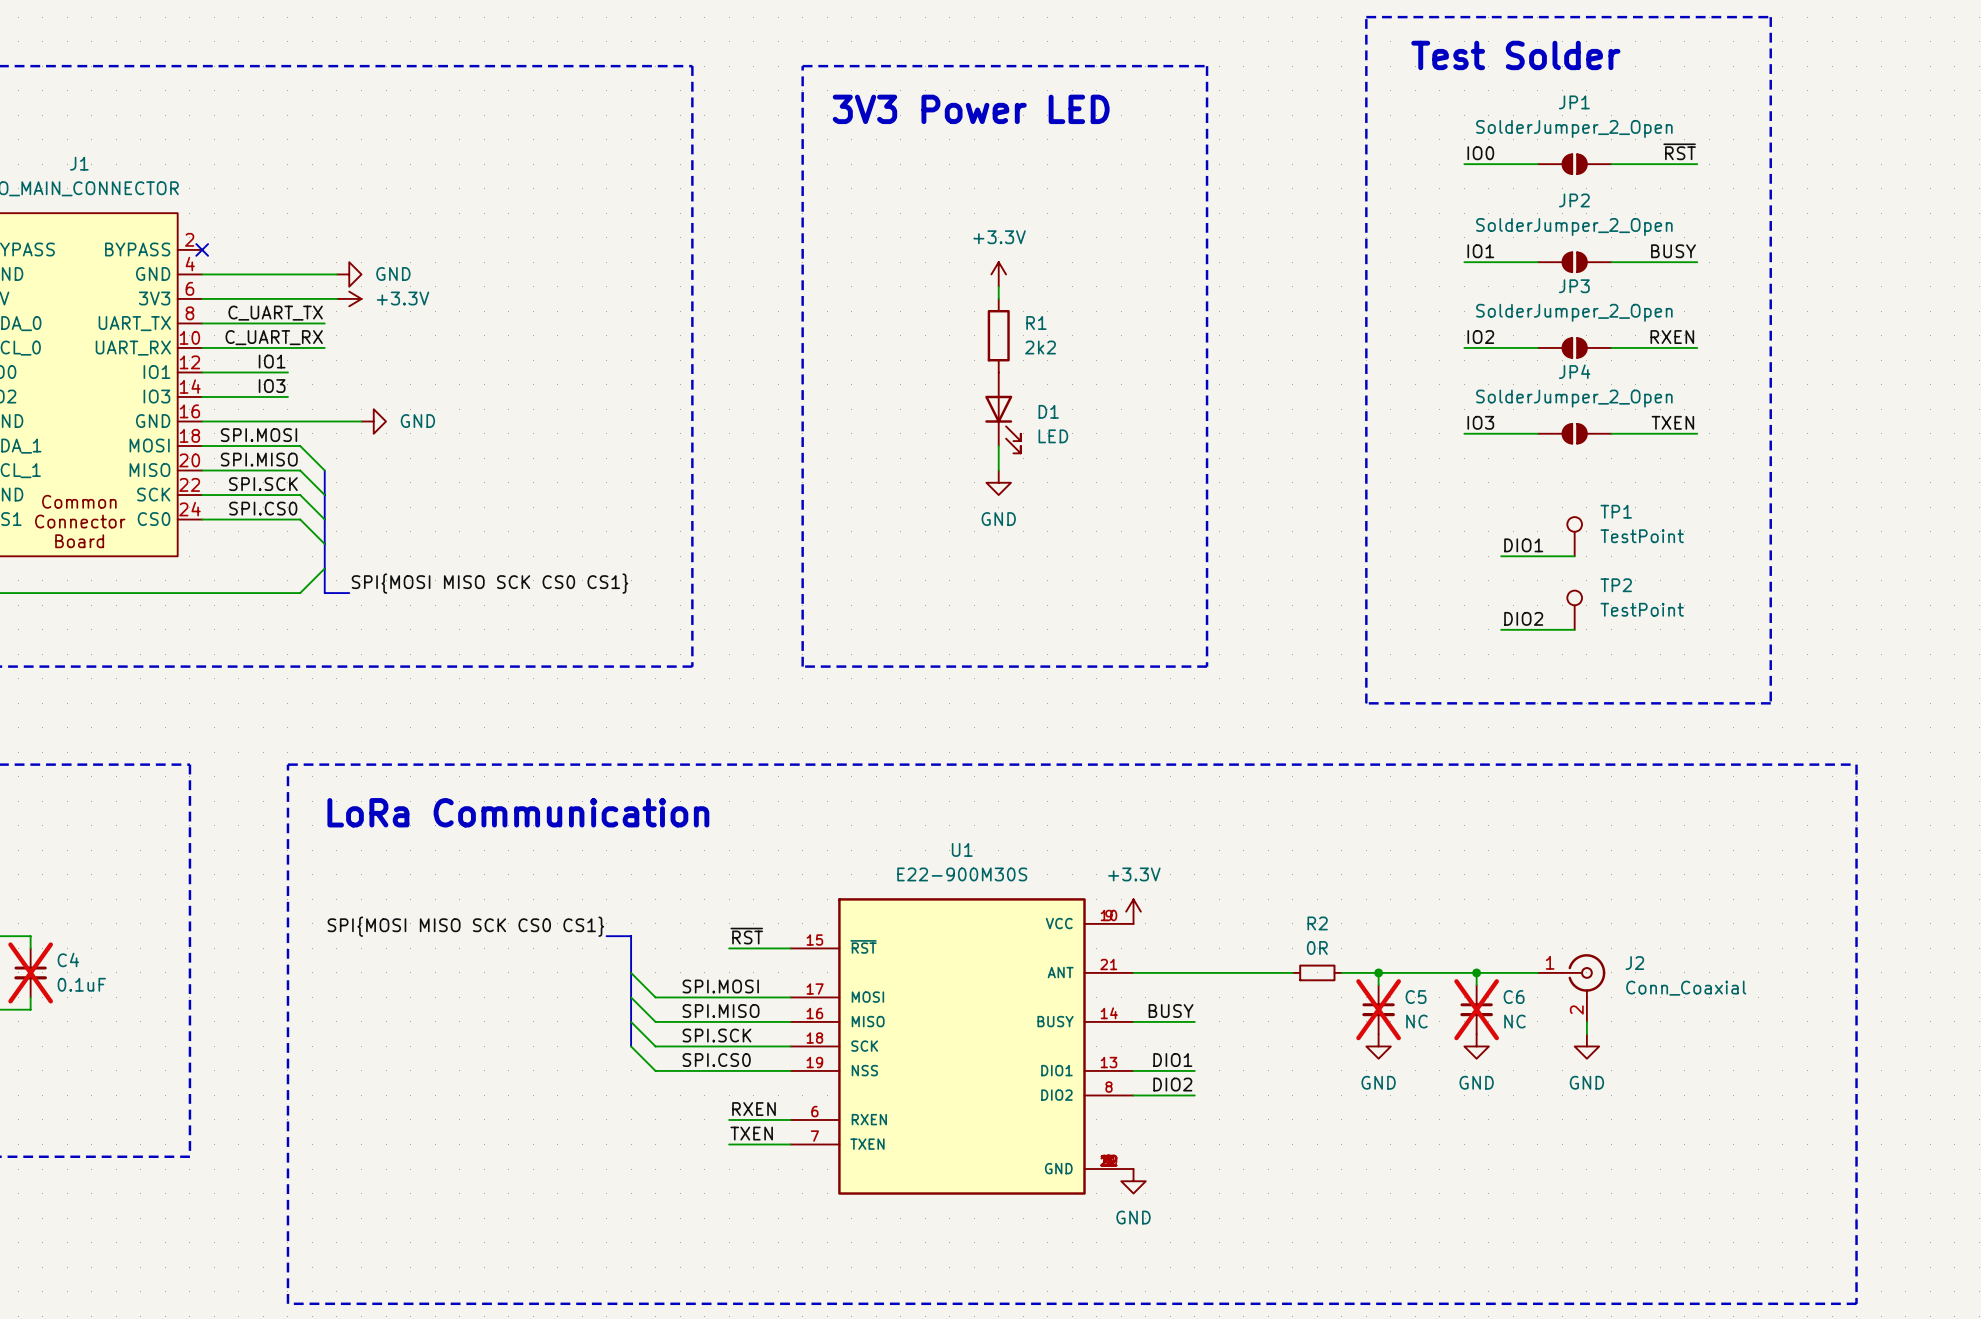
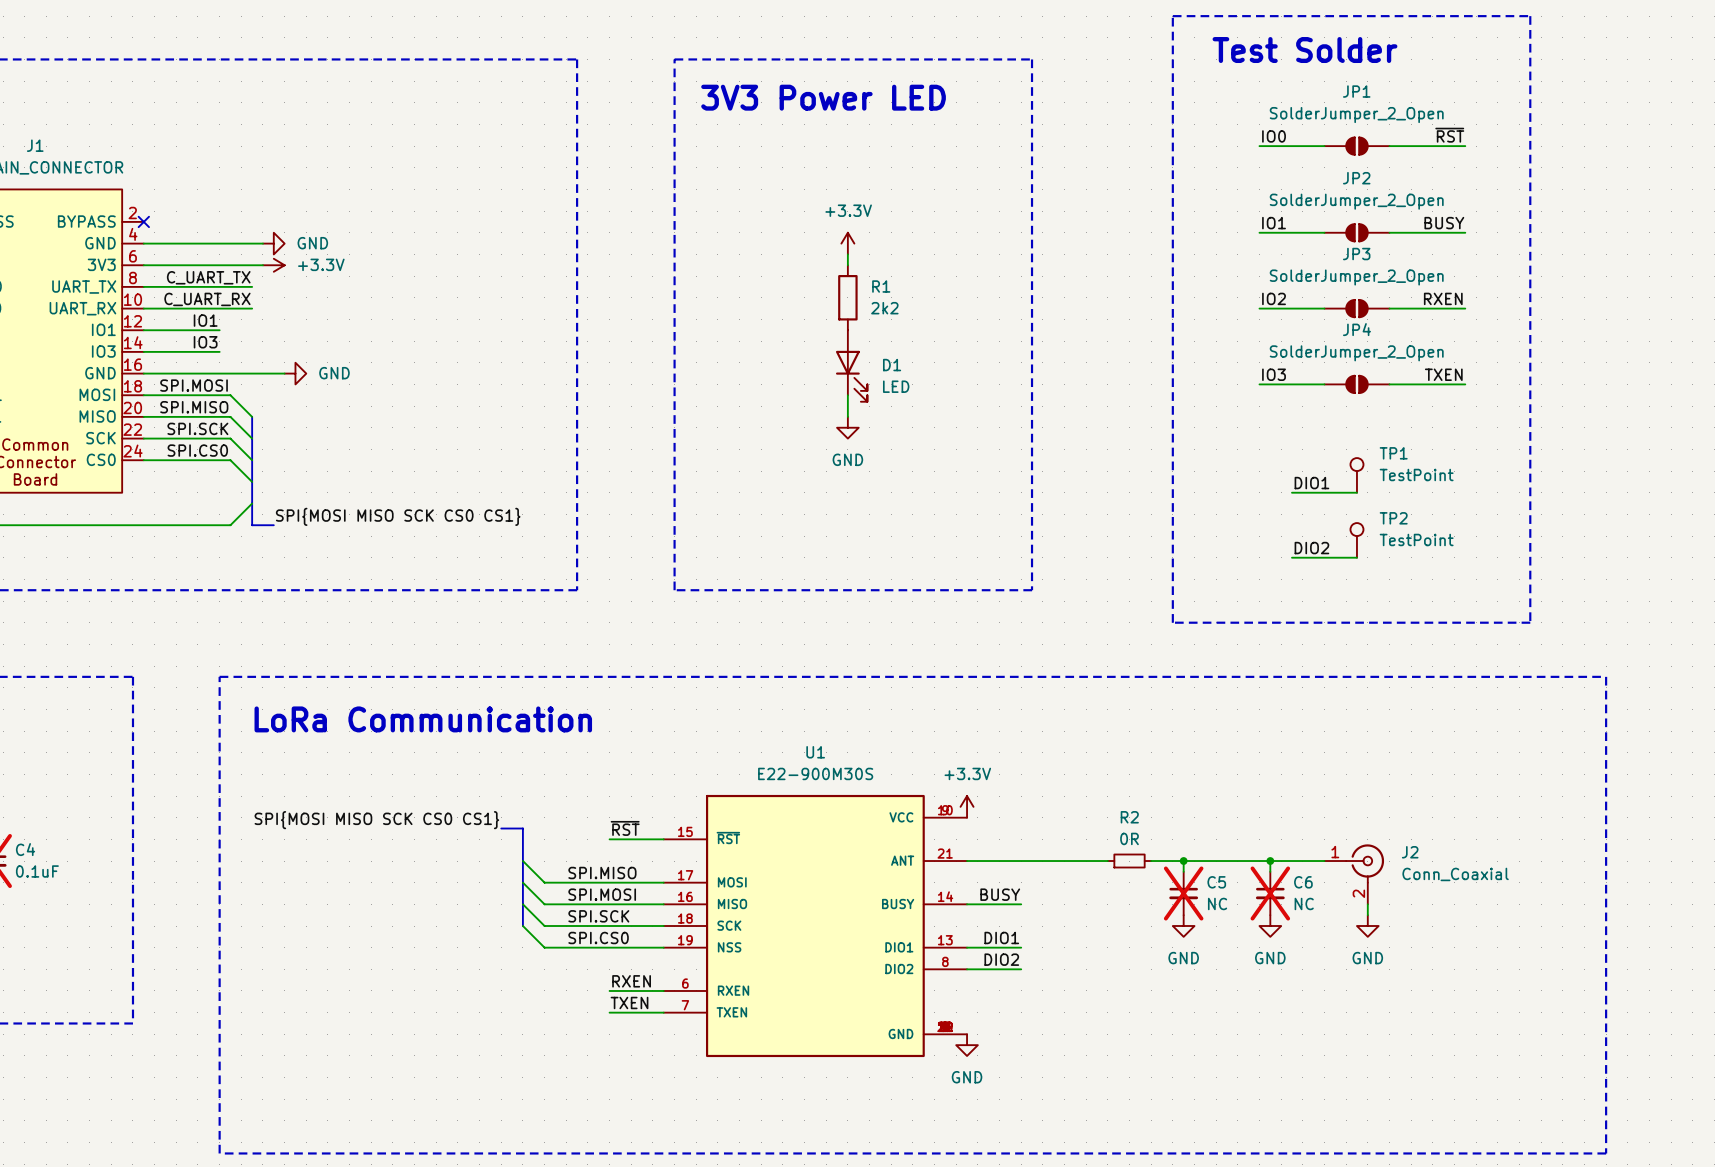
label: SPI.MOSI (720, 986) -> SPI.MISO (602, 873)
label: SPI.MISO (721, 1011) -> SPI.MOSI (602, 894)

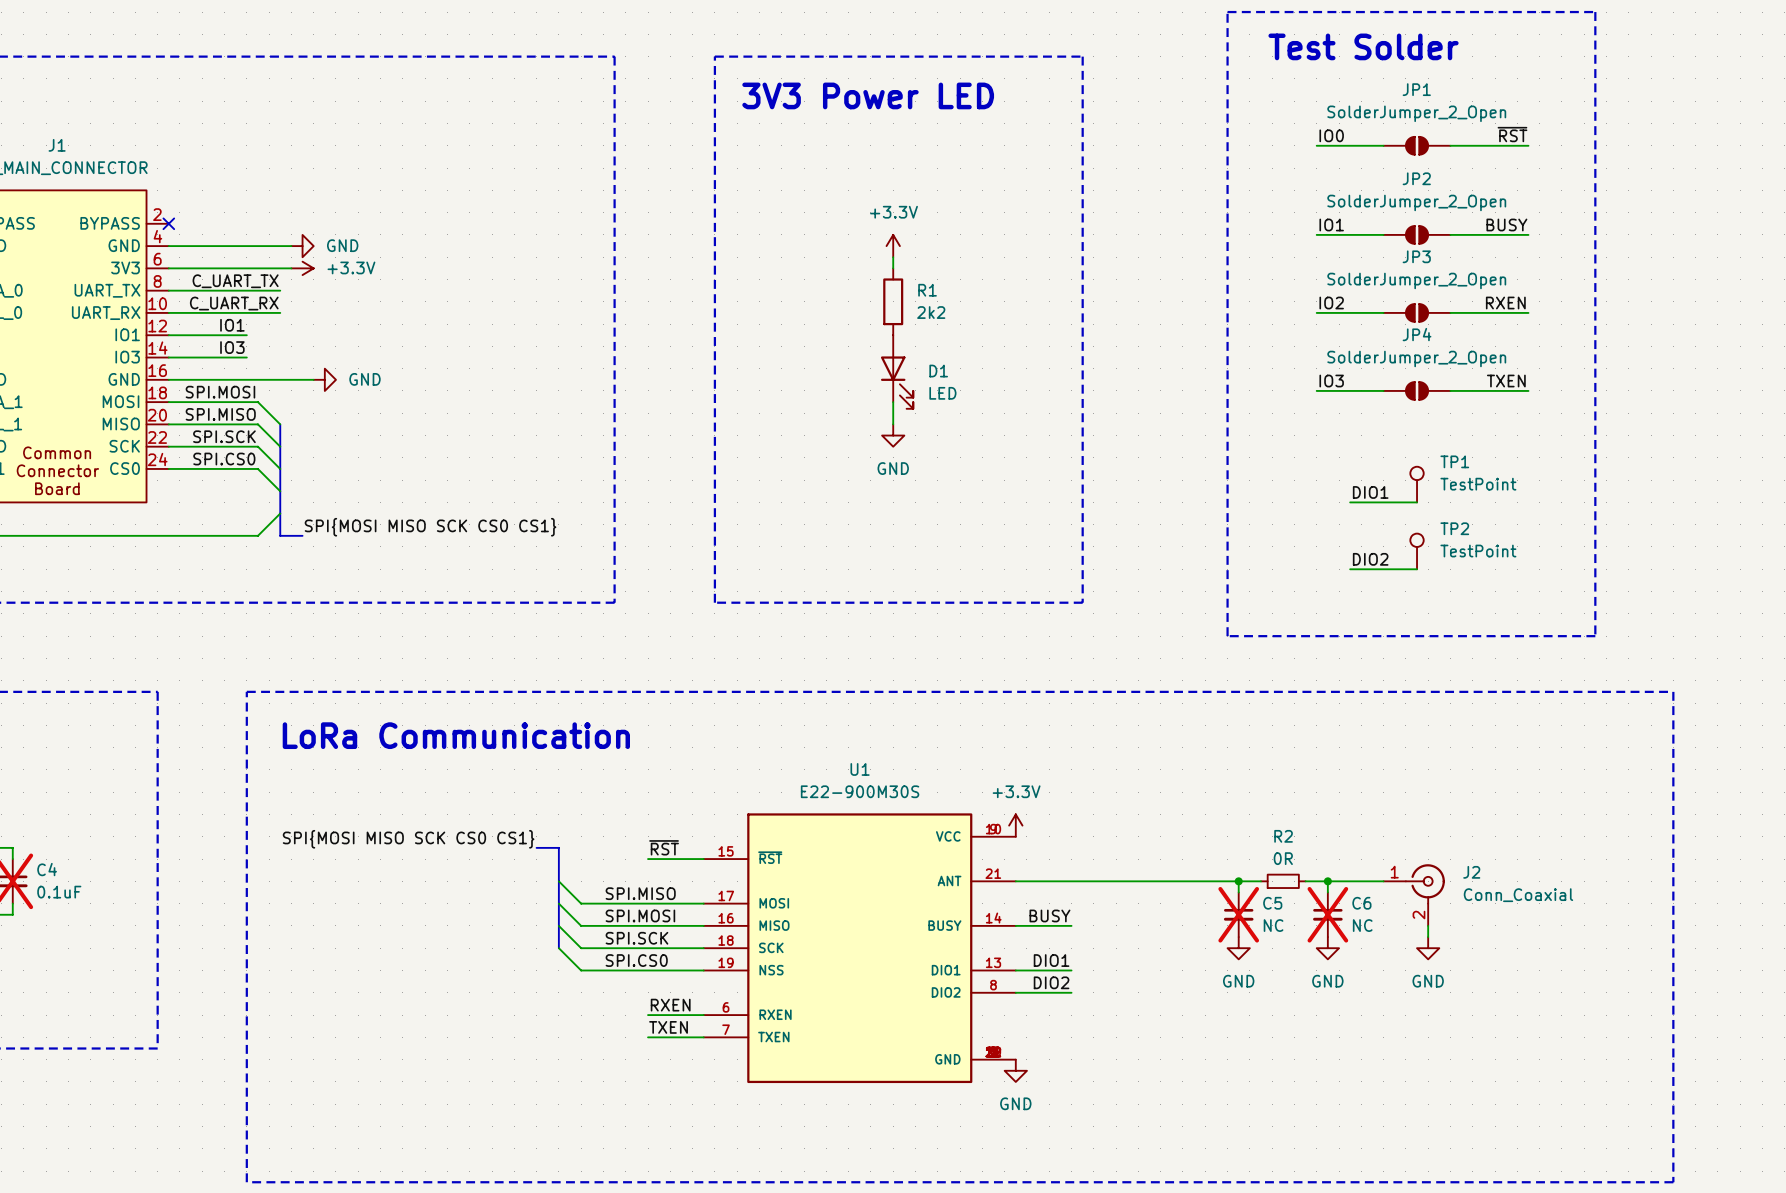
R2 position: (1129, 861) -> (1283, 881)
wire: (1205, 861) (1248, 861) -> (1160, 881) (1205, 881)

